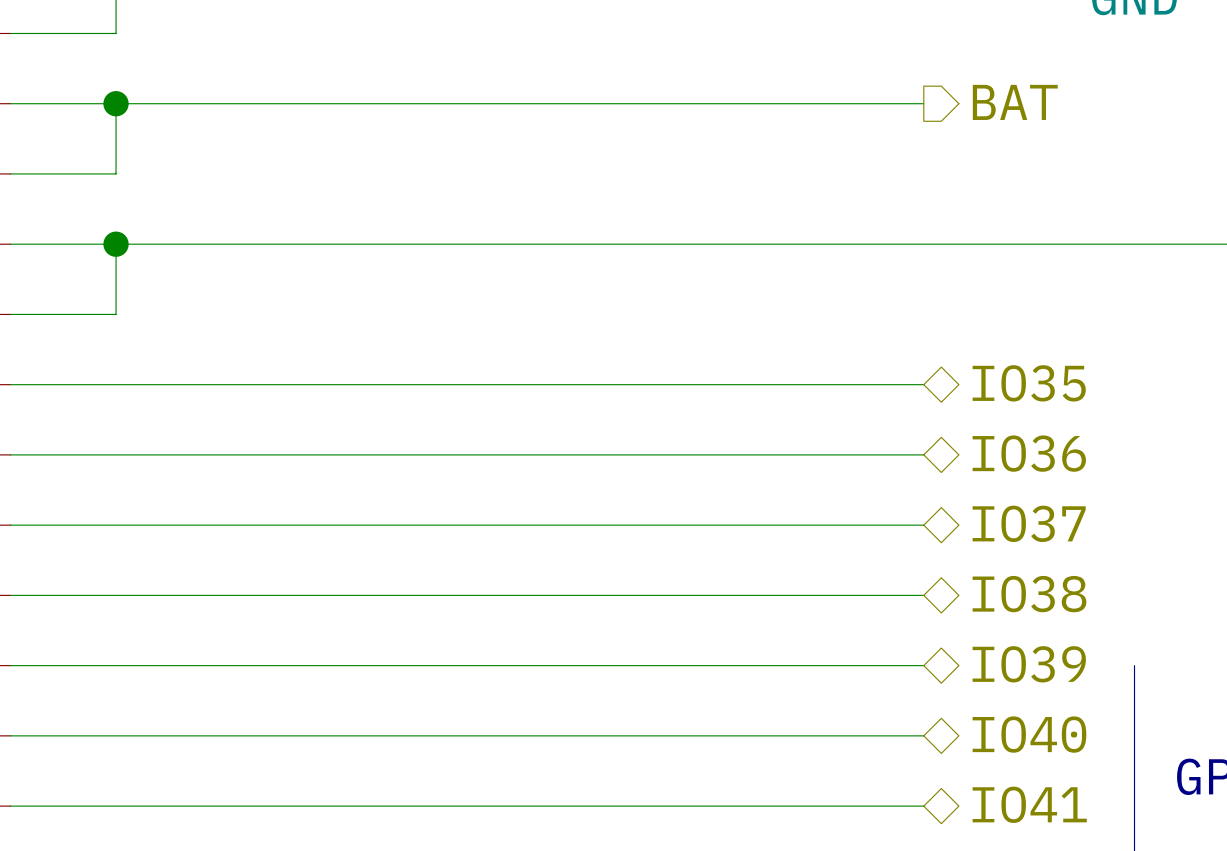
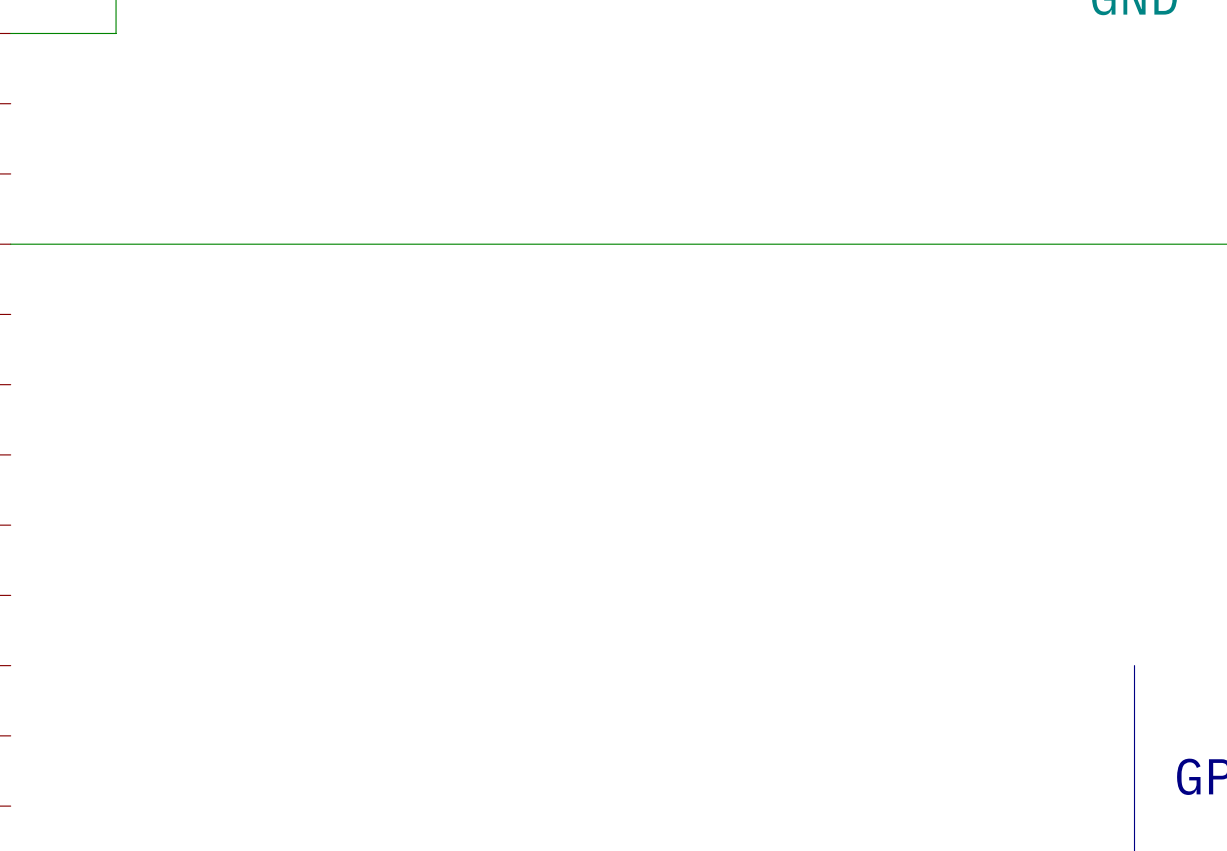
hierarchical label: BAT (1015, 102) -> none
wire: (10, 103) (923, 103) -> none
wire: (116, 103) (116, 173) (10, 173) -> none
junction: (116, 103) -> none
wire: (116, 244) (116, 314) (10, 314) -> none
junction: (116, 244) -> none
hierarchical label: IO35 (1029, 383) -> none
wire: (10, 384) (923, 384) -> none
hierarchical label: IO36 (1029, 453) -> none
wire: (10, 454) (923, 454) -> none
hierarchical label: IO37 (1029, 523) -> none
wire: (10, 525) (923, 525) -> none
hierarchical label: IO38 (1029, 594) -> none
wire: (10, 595) (923, 595) -> none
hierarchical label: IO39 (1029, 664) -> none
wire: (10, 665) (923, 665) -> none
hierarchical label: IO40 (1029, 734) -> none
wire: (10, 735) (923, 735) -> none
hierarchical label: IO41 (1029, 804) -> none
wire: (10, 806) (923, 806) -> none

